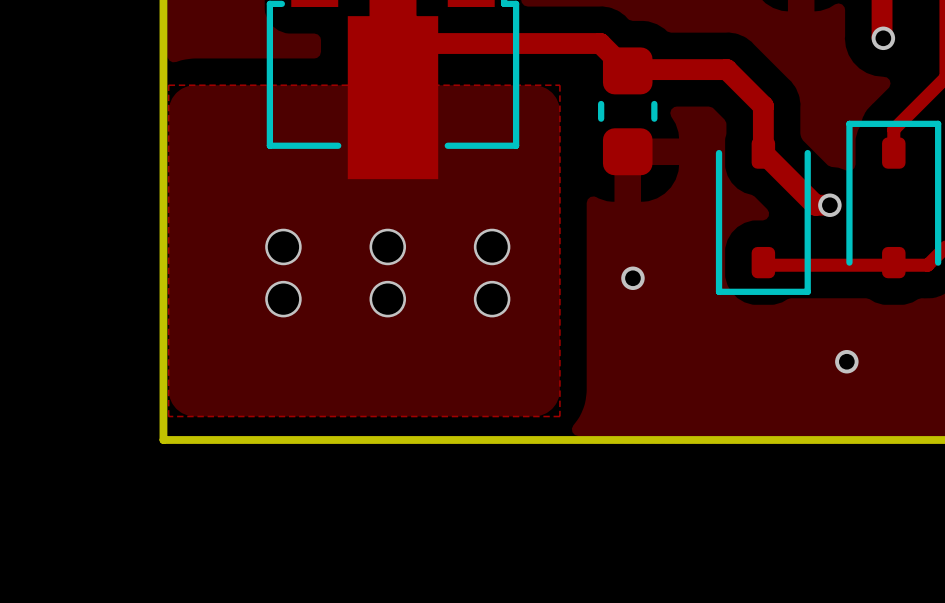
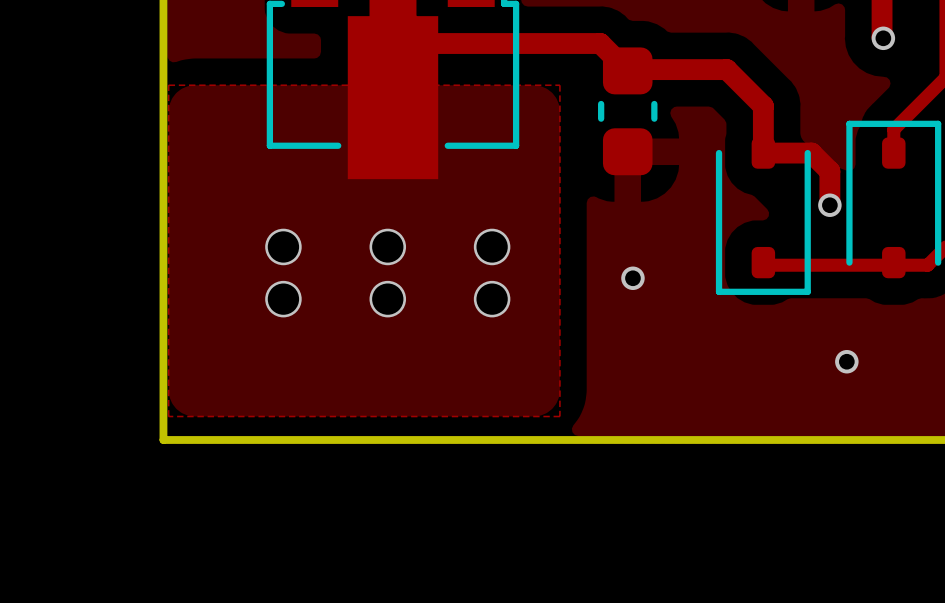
track: (763, 153) (815, 205) (829, 205) -> (763, 153) (811, 153) (829, 171) (829, 205)

